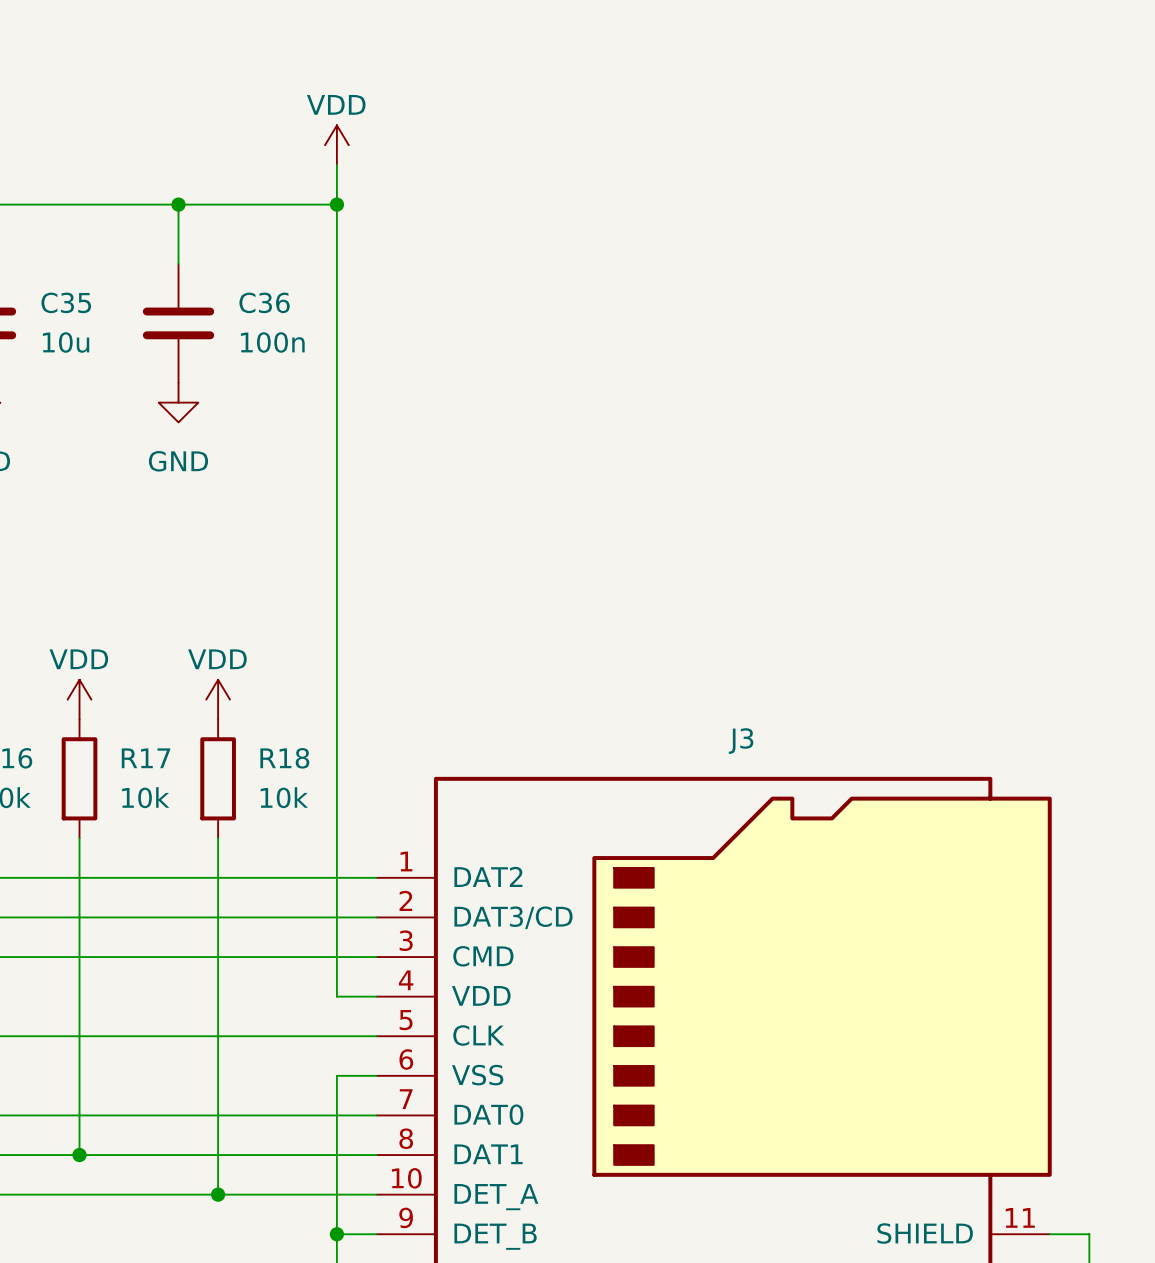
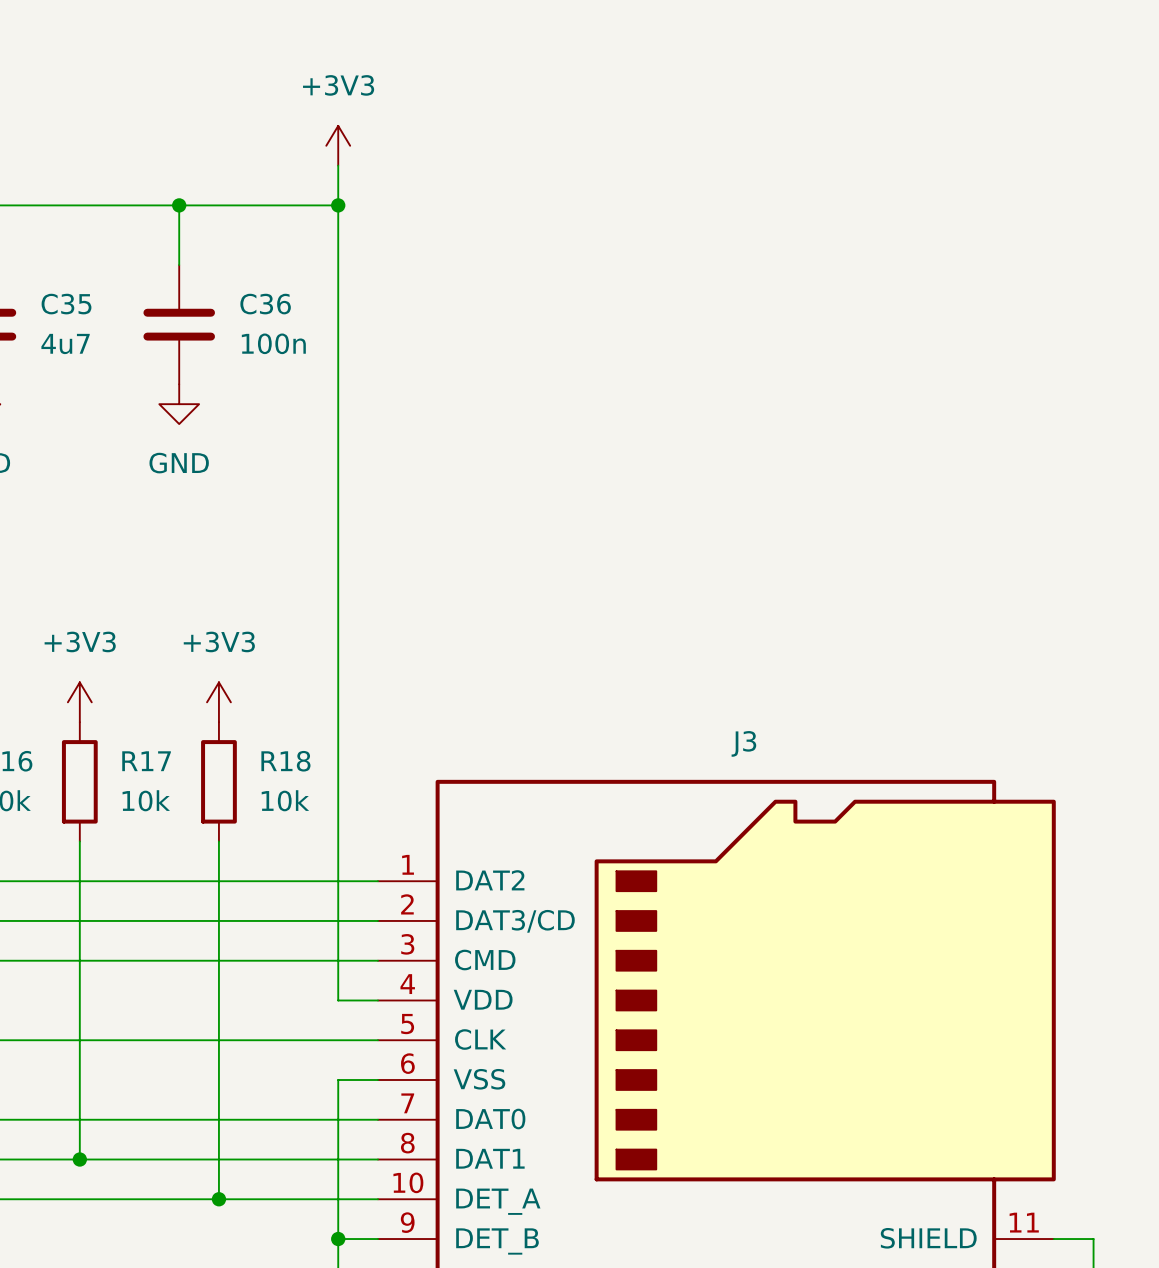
power symbol: VDD (336, 145) -> +3V3 (338, 145)
C35 value: 10u (66, 342) -> 4u7 (65, 343)
power symbol: VDD (79, 699) -> +3V3 (79, 702)
power symbol: VDD (218, 699) -> +3V3 (218, 702)

